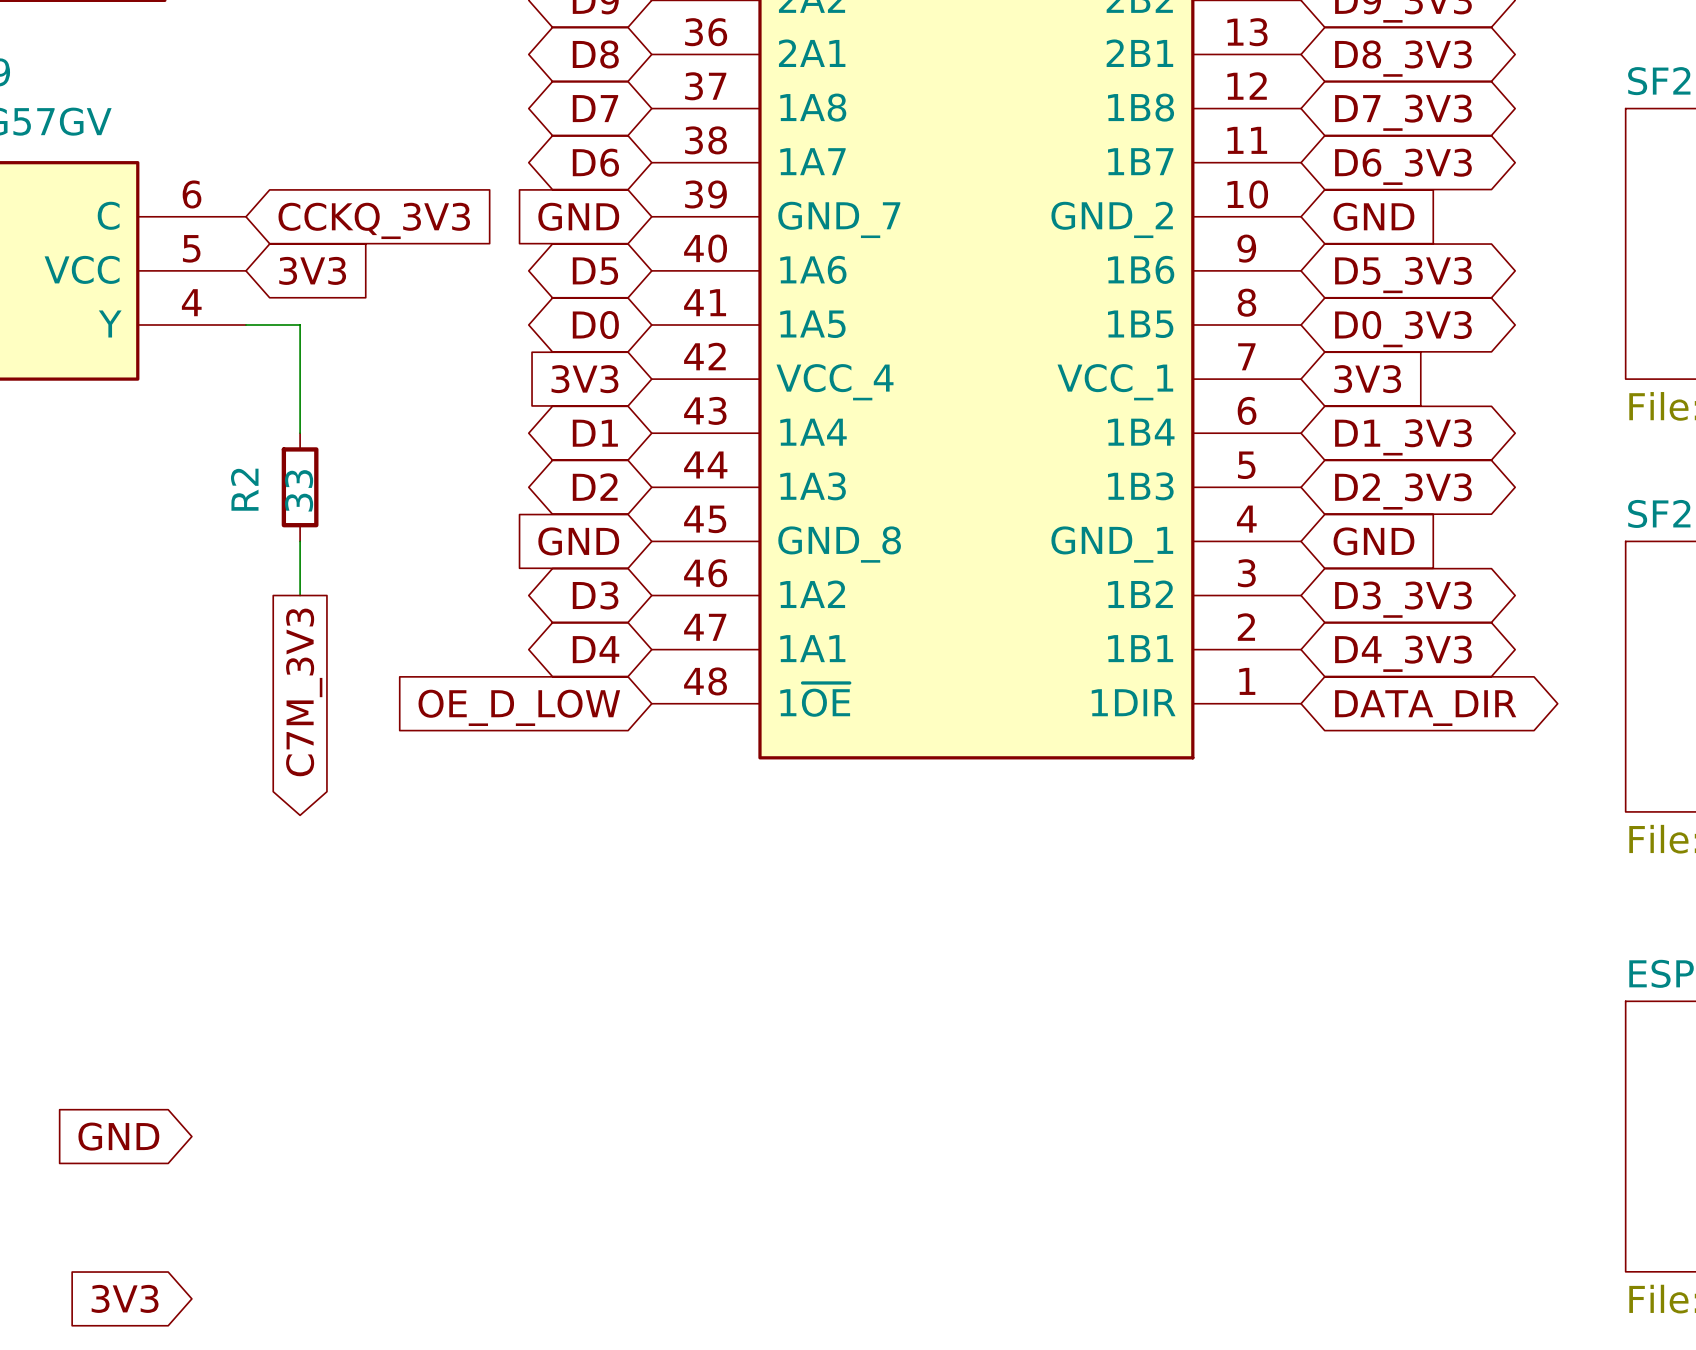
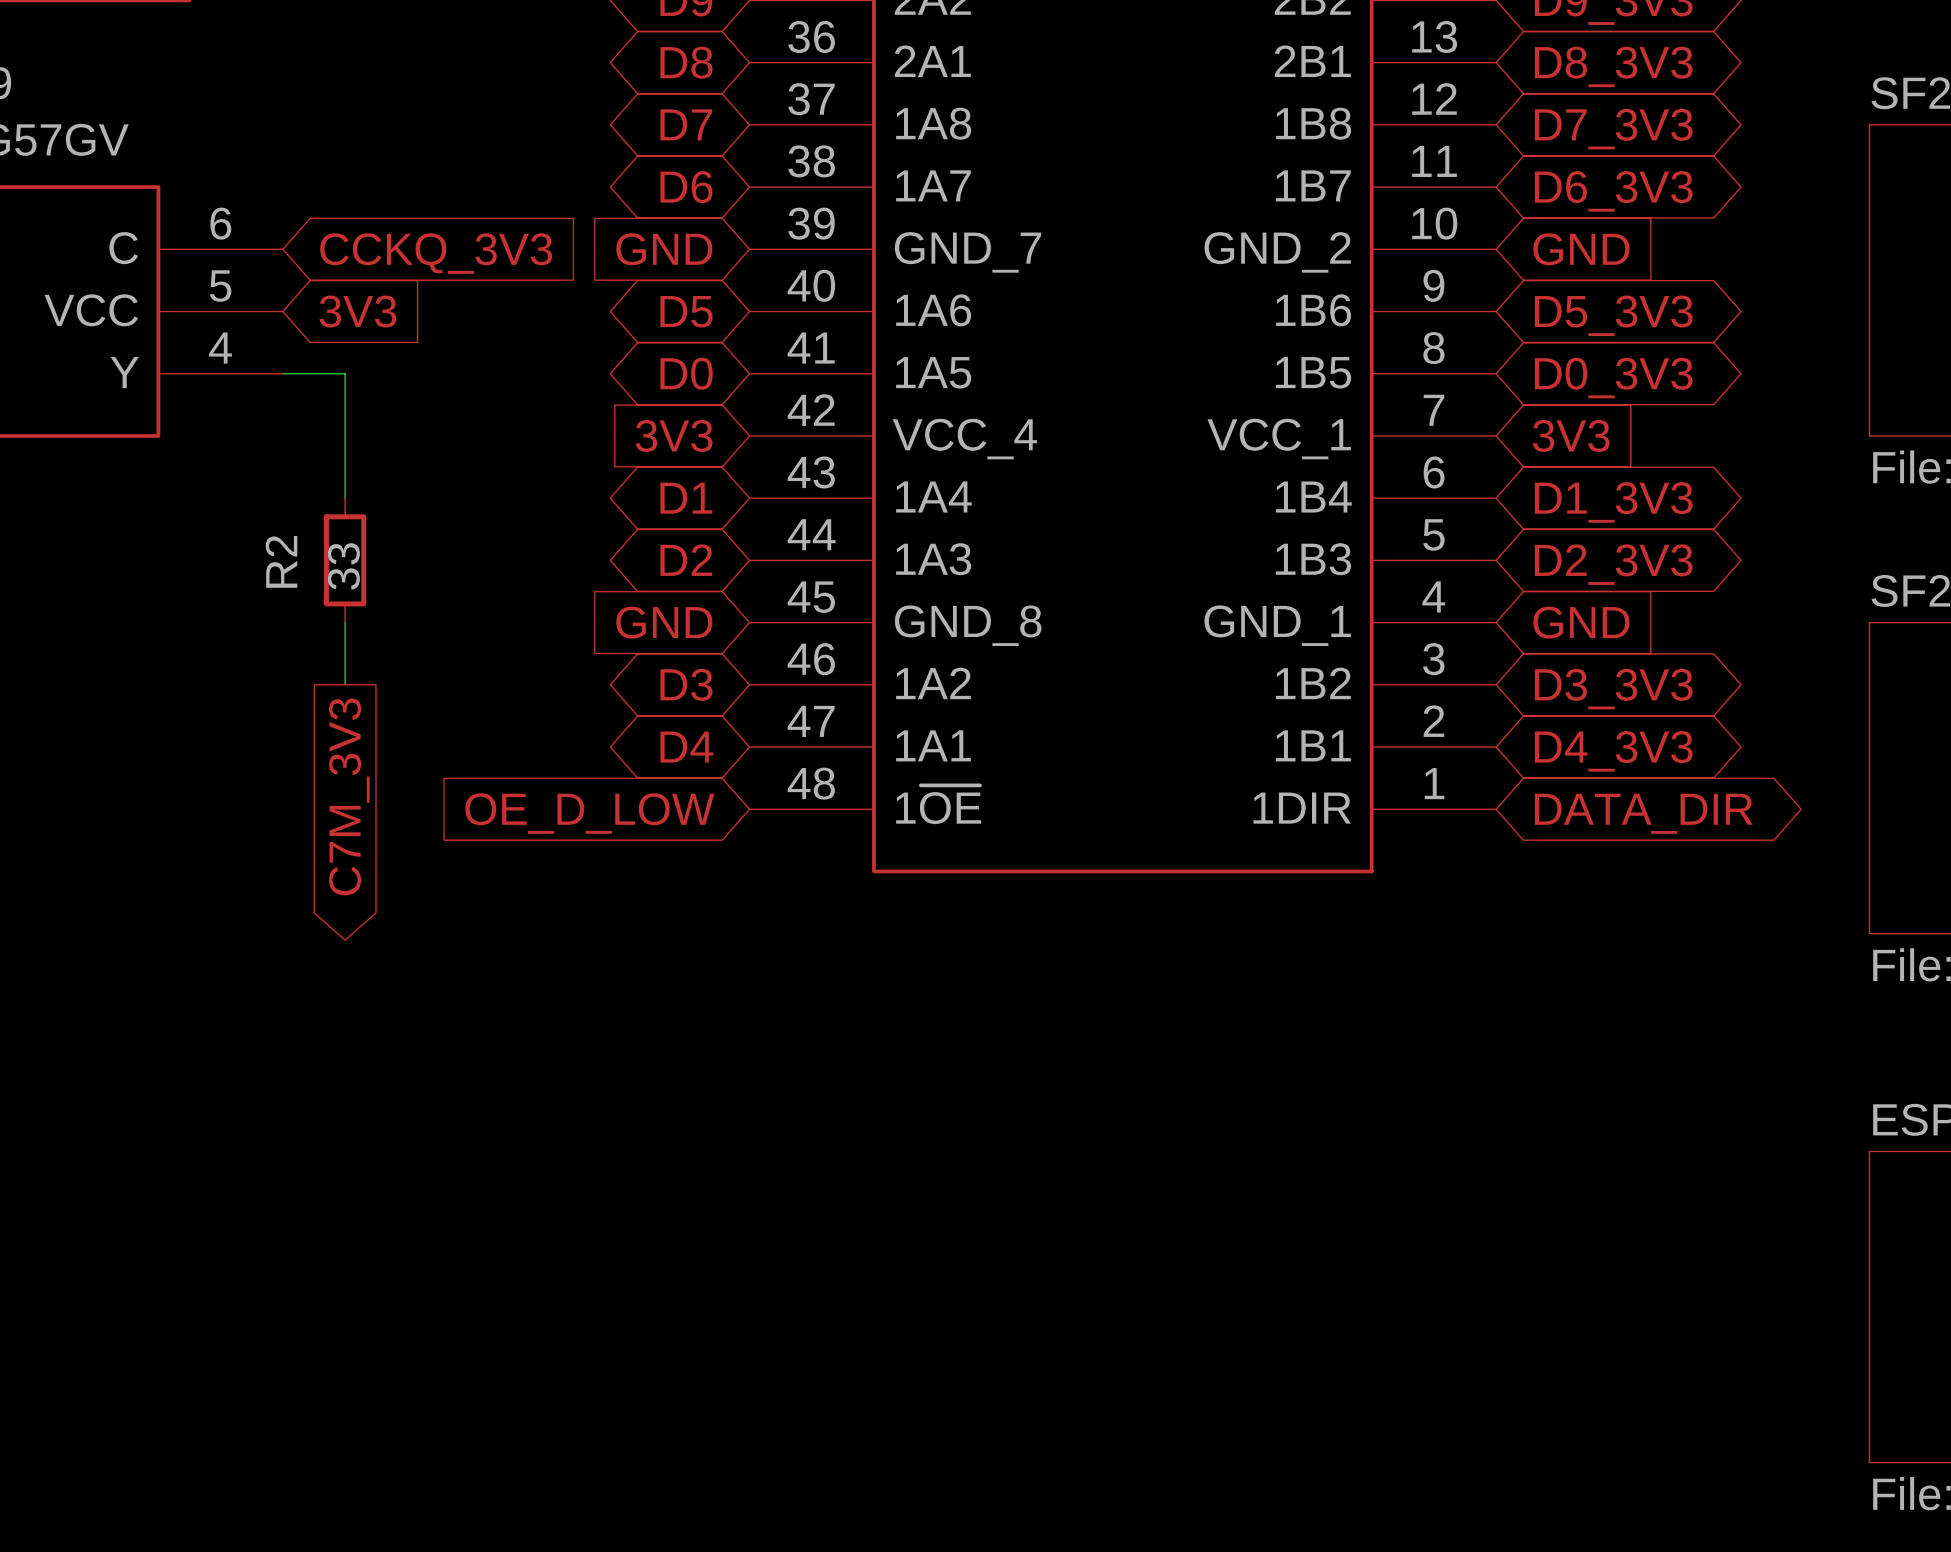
global label: GND (118, 1136) -> none
global label: 3V3 (125, 1298) -> none

